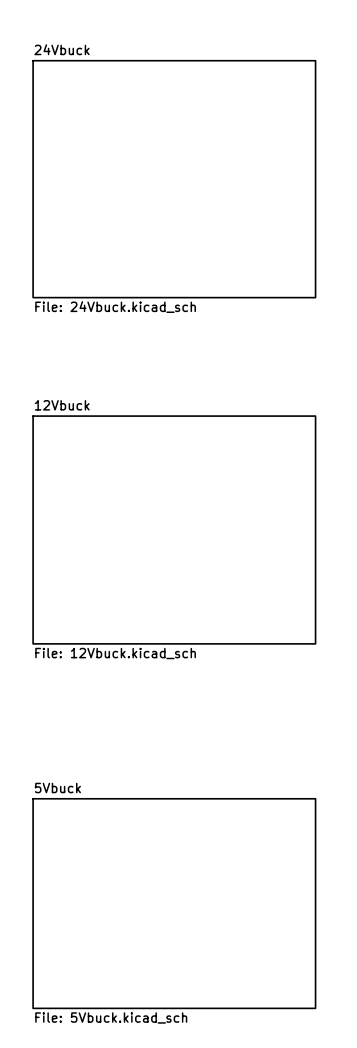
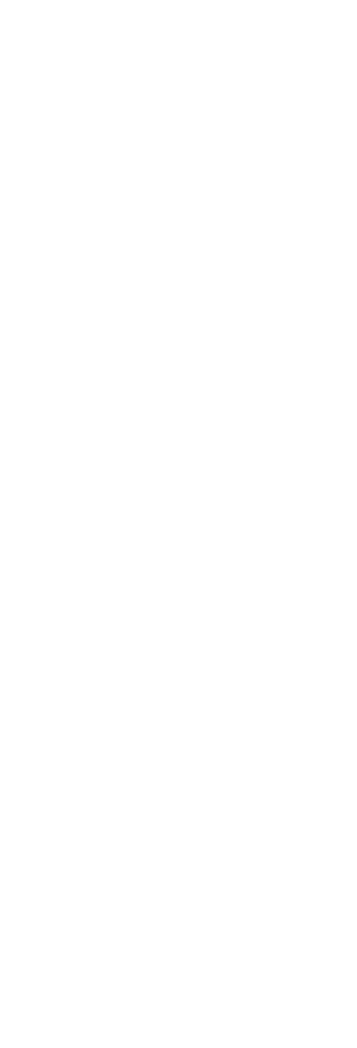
sheet 24Vbuck: File: 24Vbuck.kicad_sch (174, 179) -> none
sheet 12Vbuck: File: 12Vbuck.kicad_sch (174, 529) -> none
sheet 5Vbuck: File: 5Vbuck.kicad_sch (174, 903) -> none

